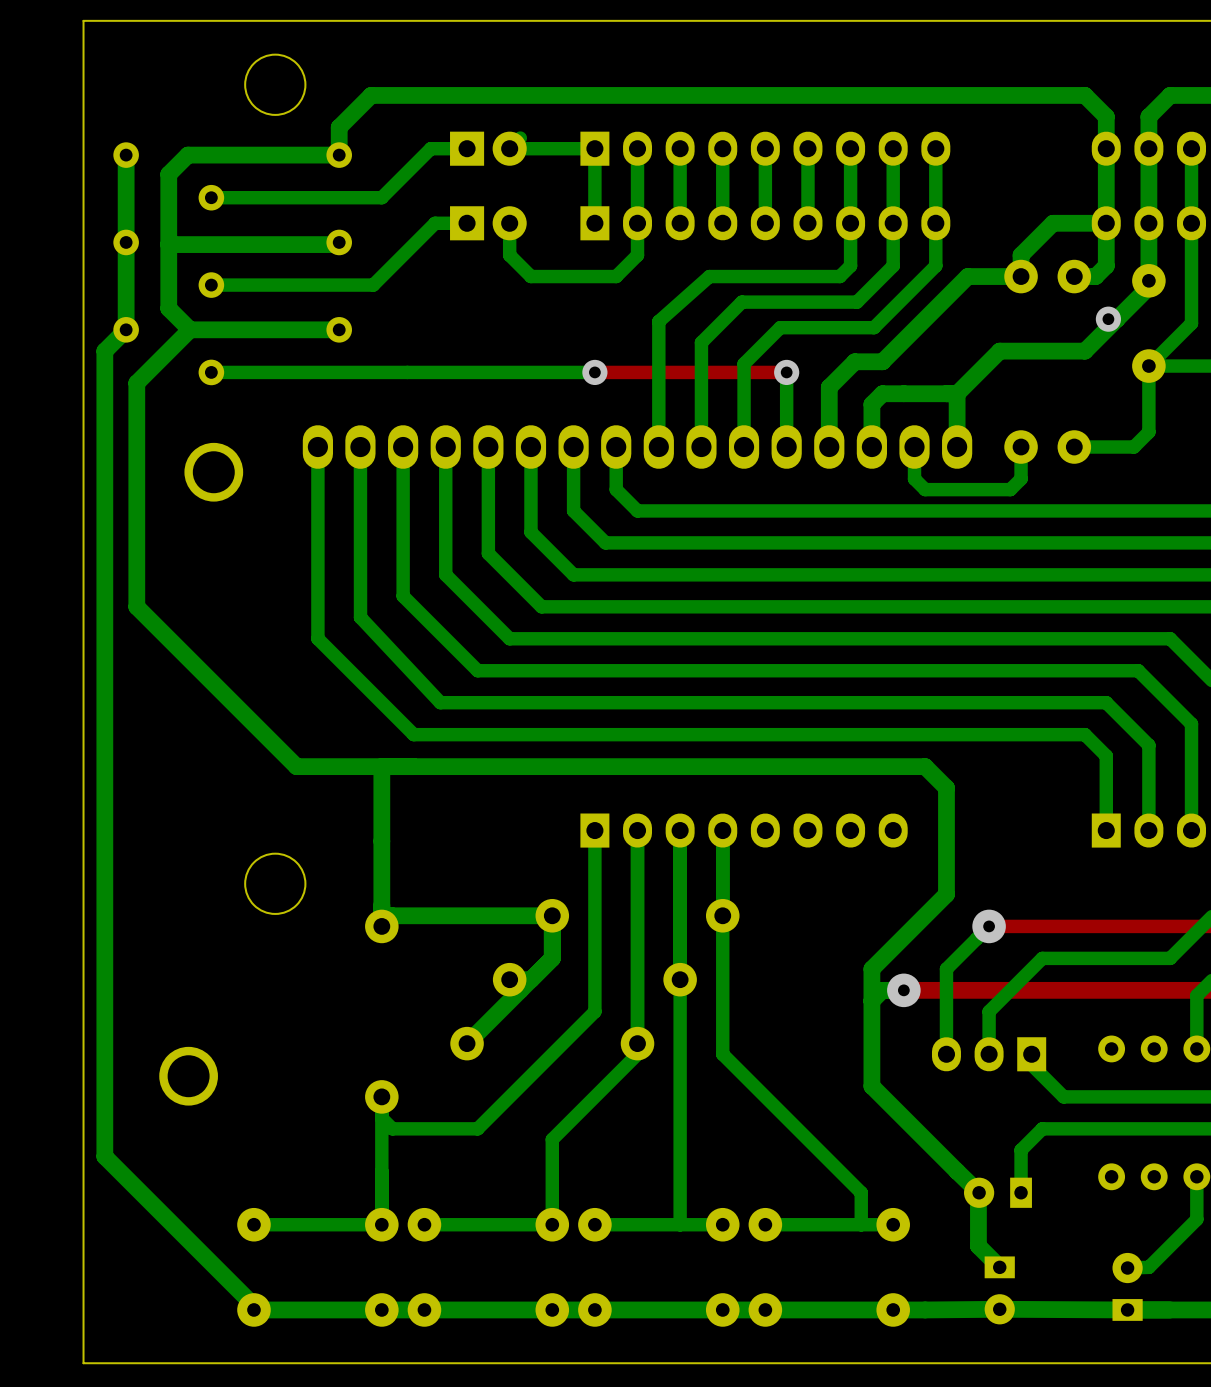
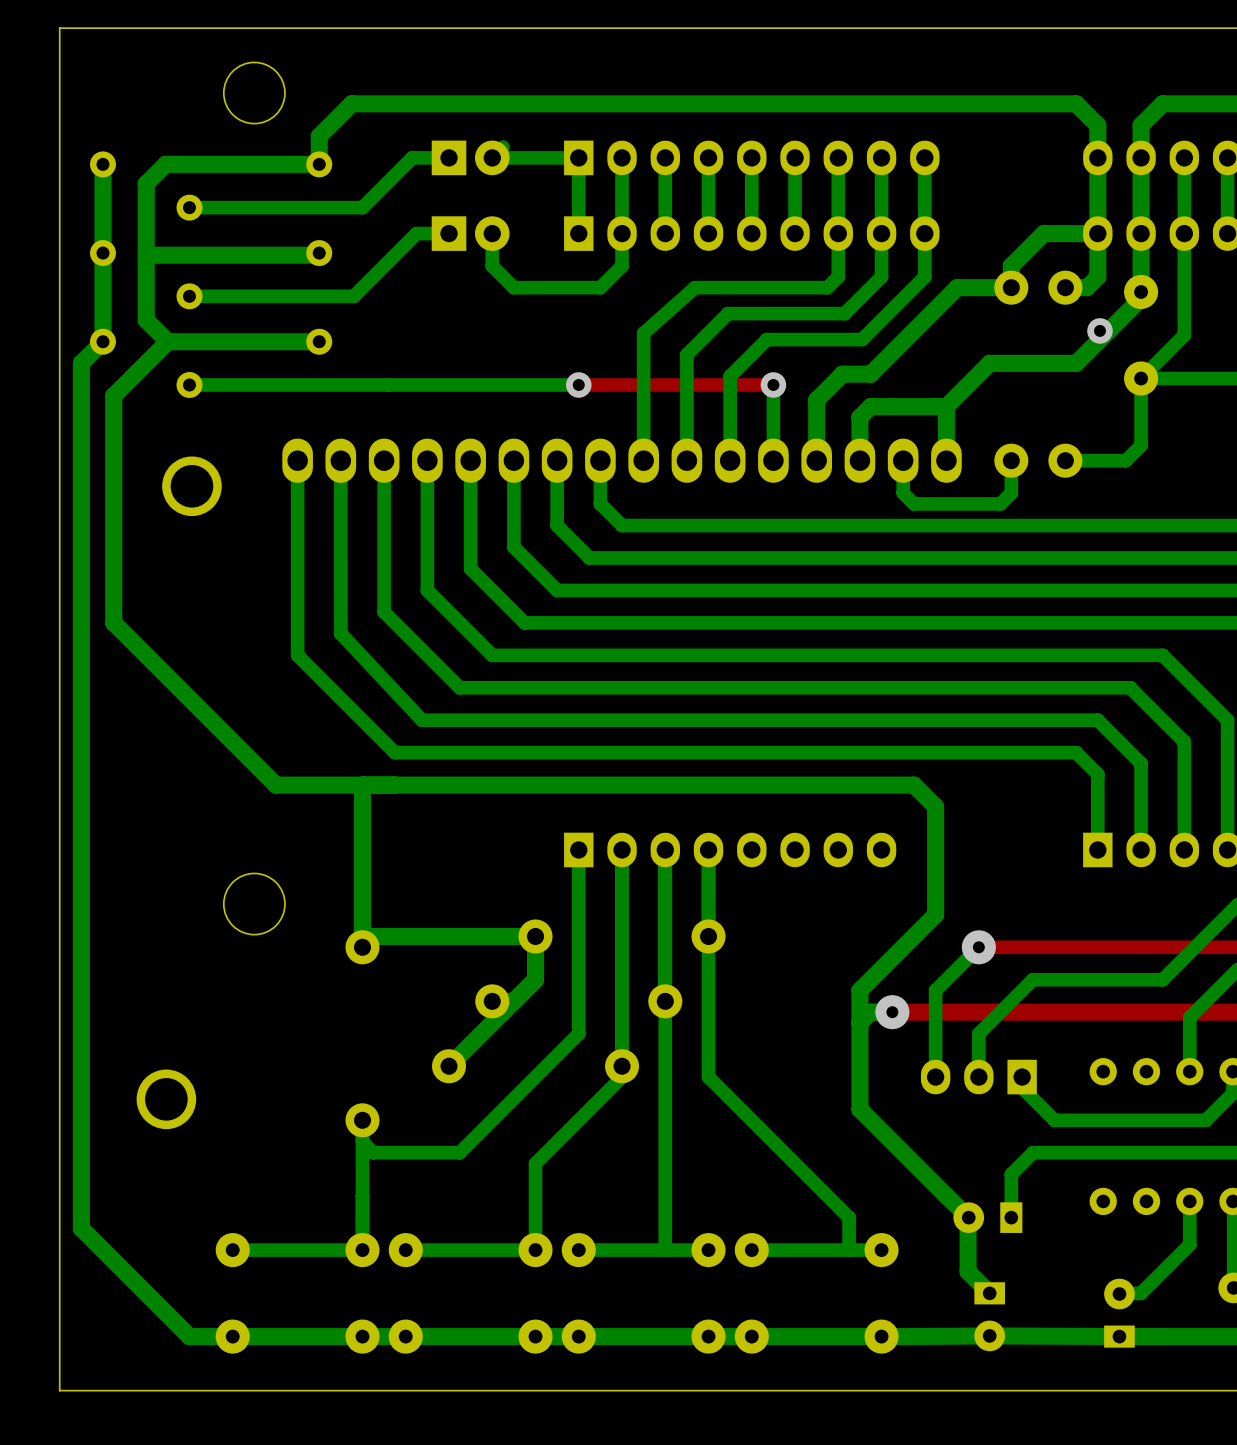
bottom track: (104, 1156) (253, 1305) (253, 1309) -> (81, 1180) (81, 1228) (189, 1336) (232, 1336)

